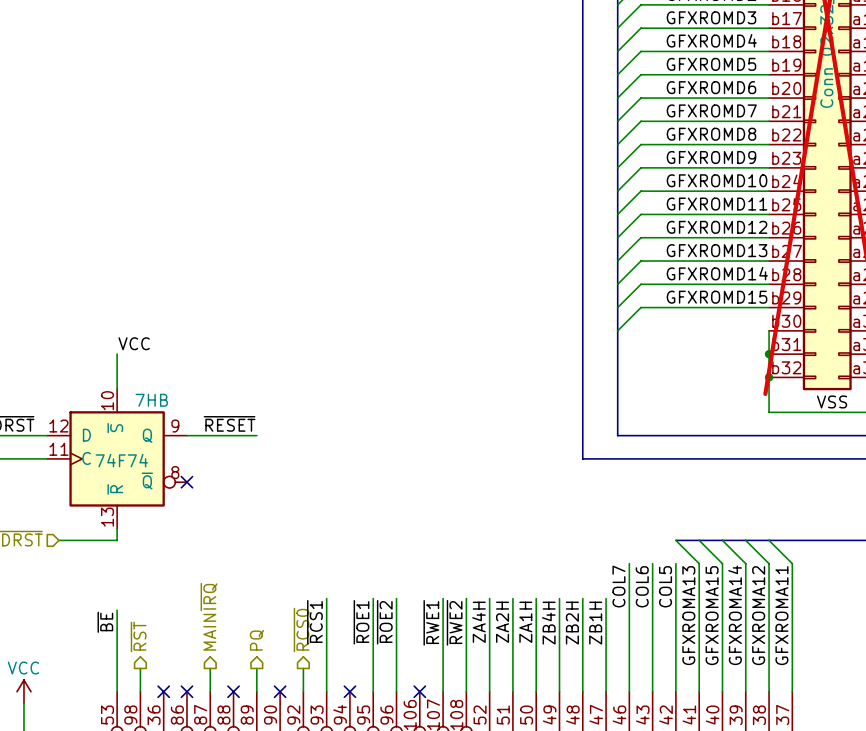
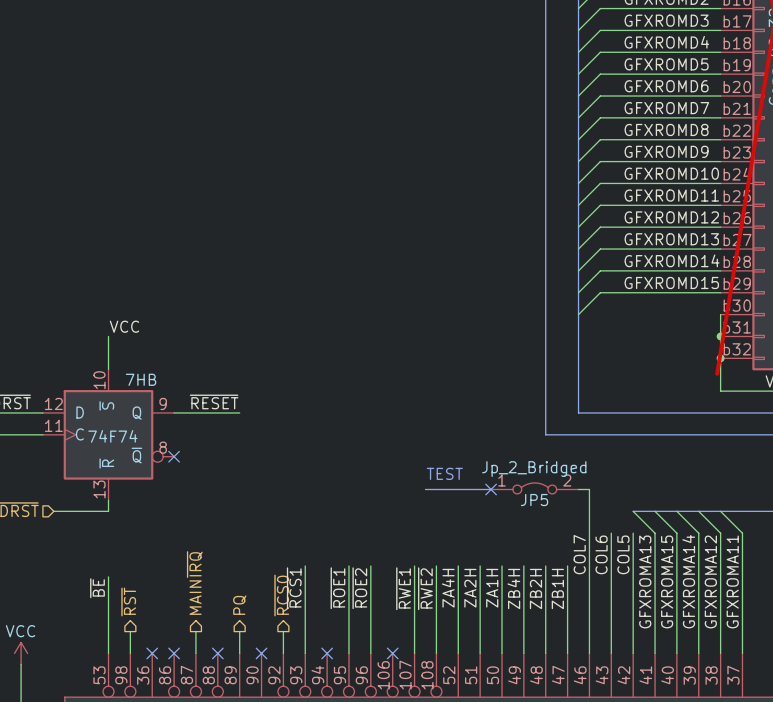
text: none -> TEST (444, 473)
JP5: none -> Jp_2_Bridged (534, 488)
line: none -> (425, 489) (491, 489)
no-connect mark: none -> (491, 489)
wire: none -> (578, 489) (589, 489) (589, 533)

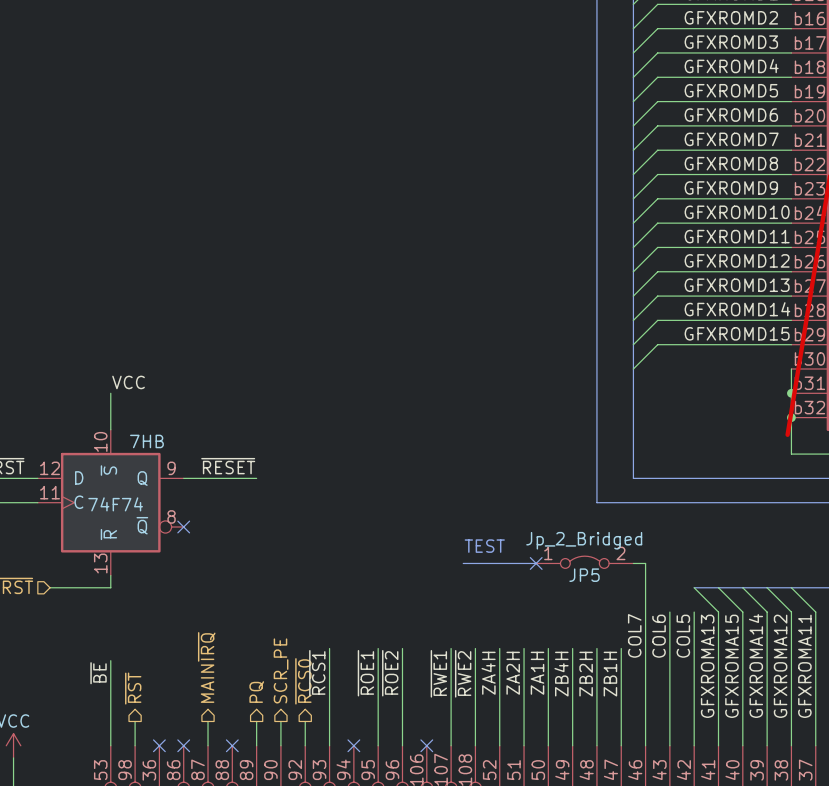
hierarchical label: none -> SCR_PE (281, 670)
wire: none -> (280, 721) (280, 745)
no-connect mark: (261, 653) -> none

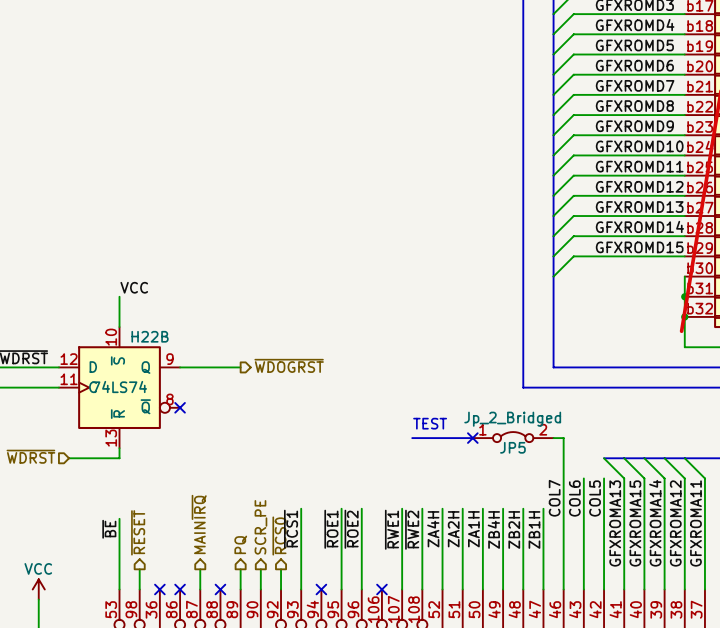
7HB name: 7HB (146, 441) -> H22B (150, 336)
label: ~{RESET} (228, 466) -> none
hierarchical label: none -> ~{WDOGRST} (289, 365)
7HB value: 74F74 (115, 504) -> 74LS74 (119, 387)
hierarchical label: ~{RST} (133, 688) -> ~{RESET} (138, 532)

